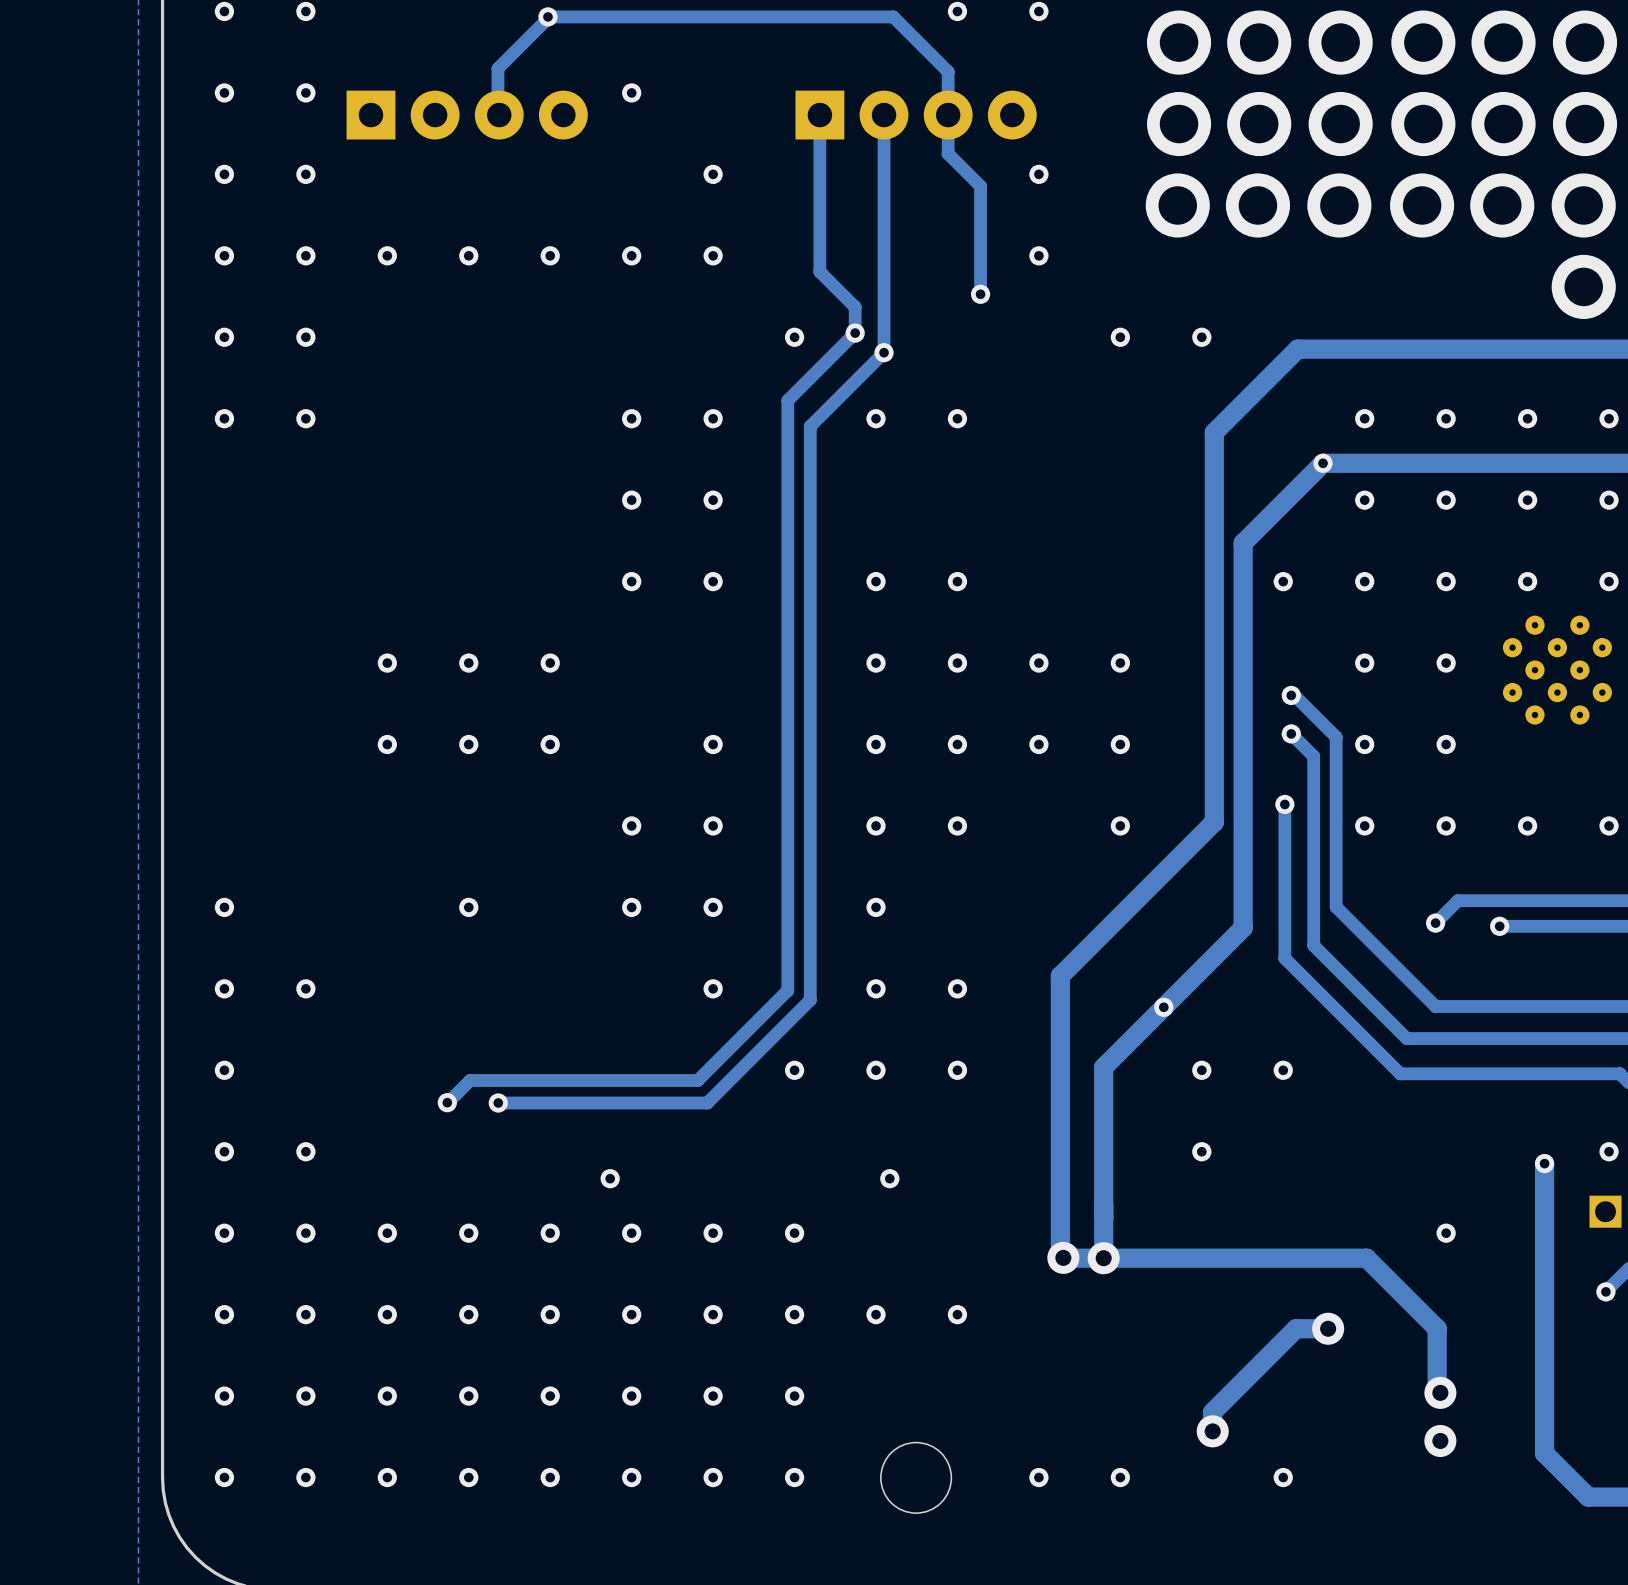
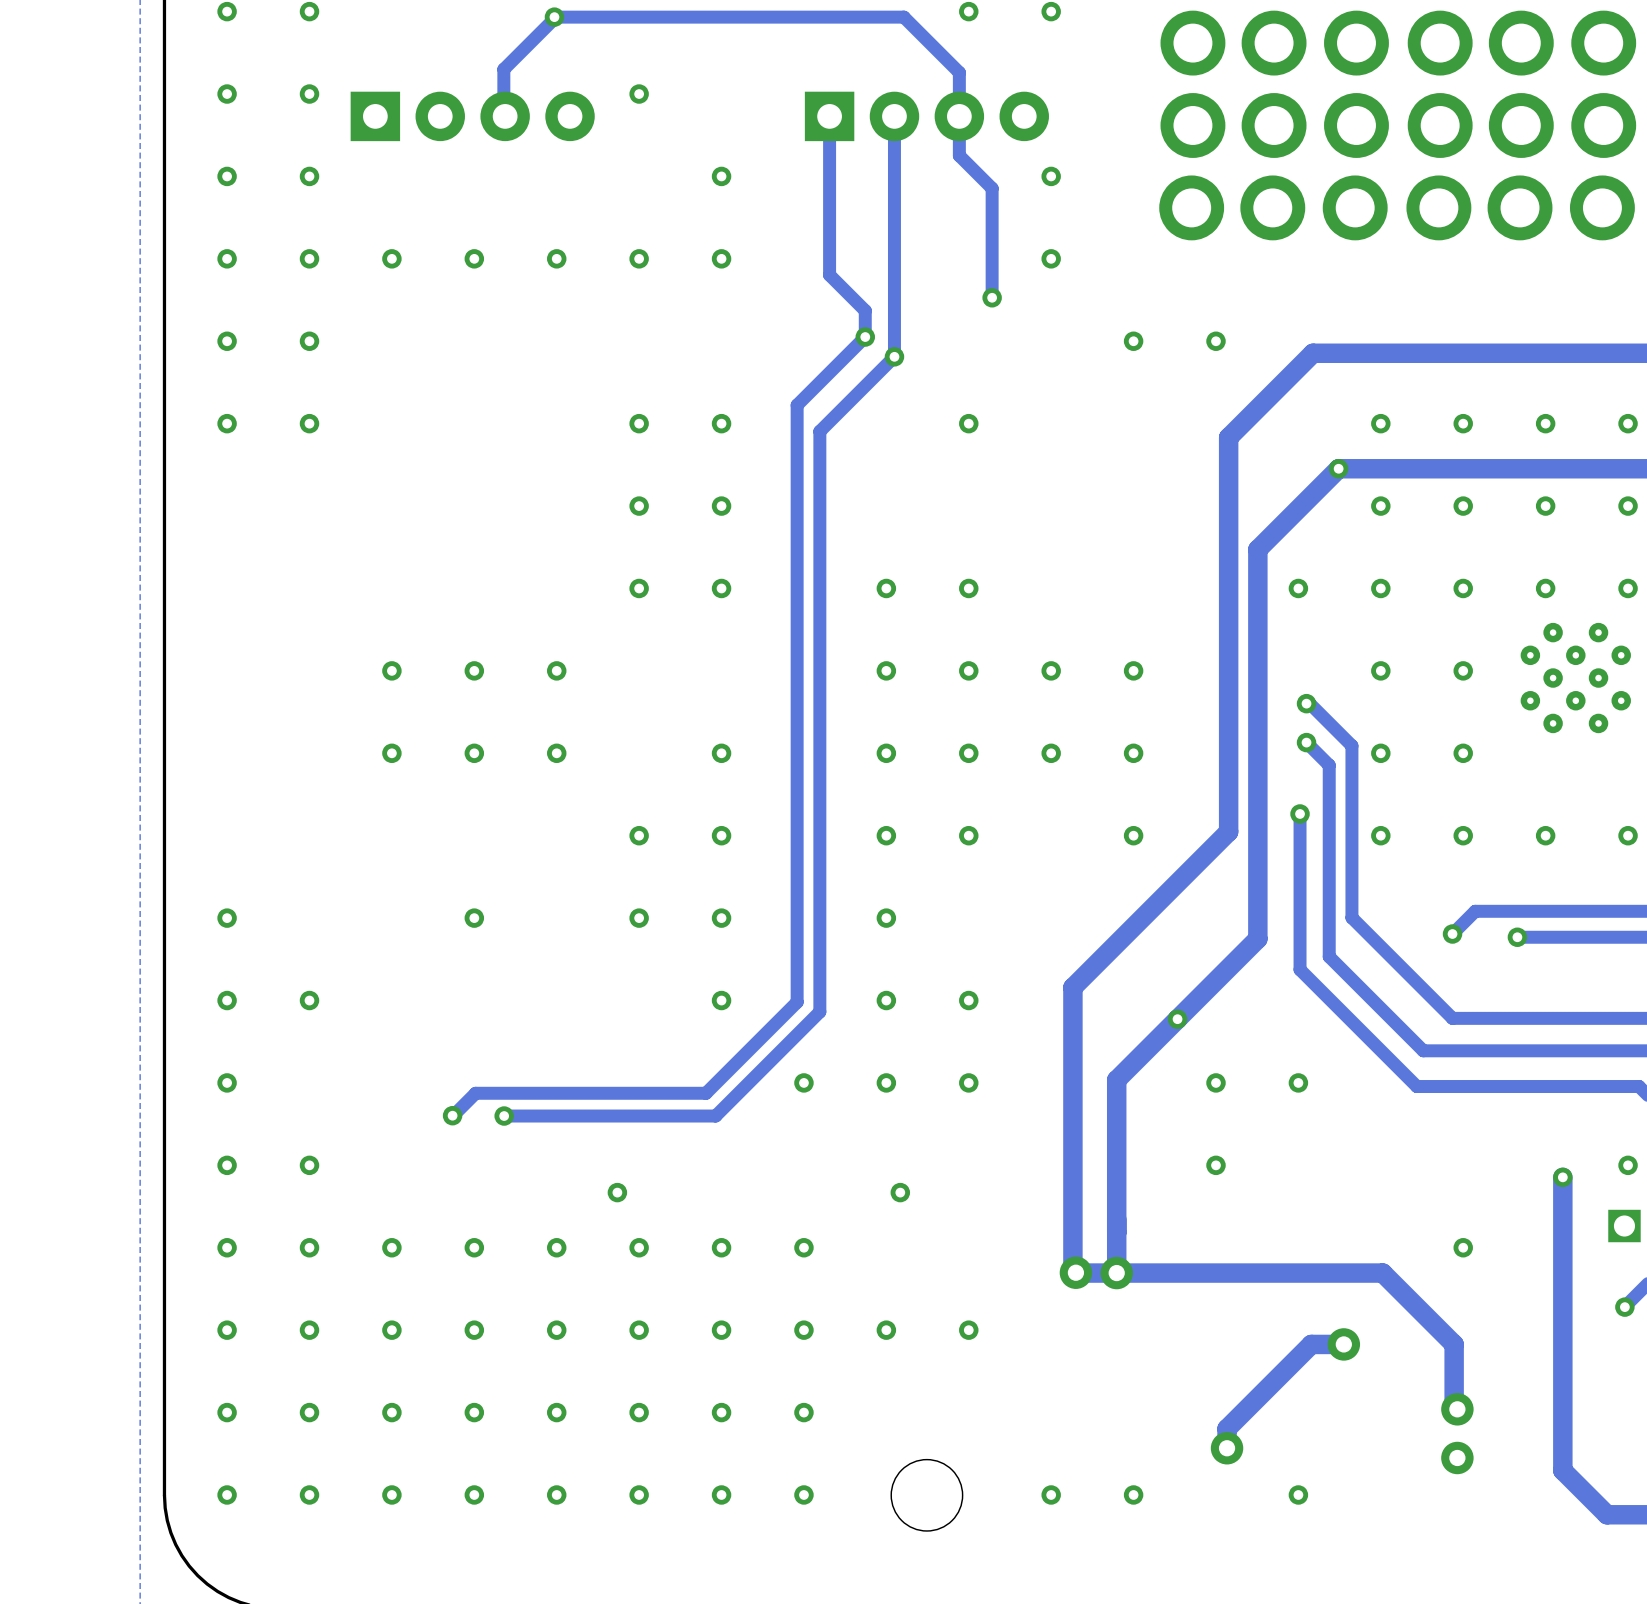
via: (1583, 286) -> none
via: (794, 337) -> none
via: (876, 418) -> none

